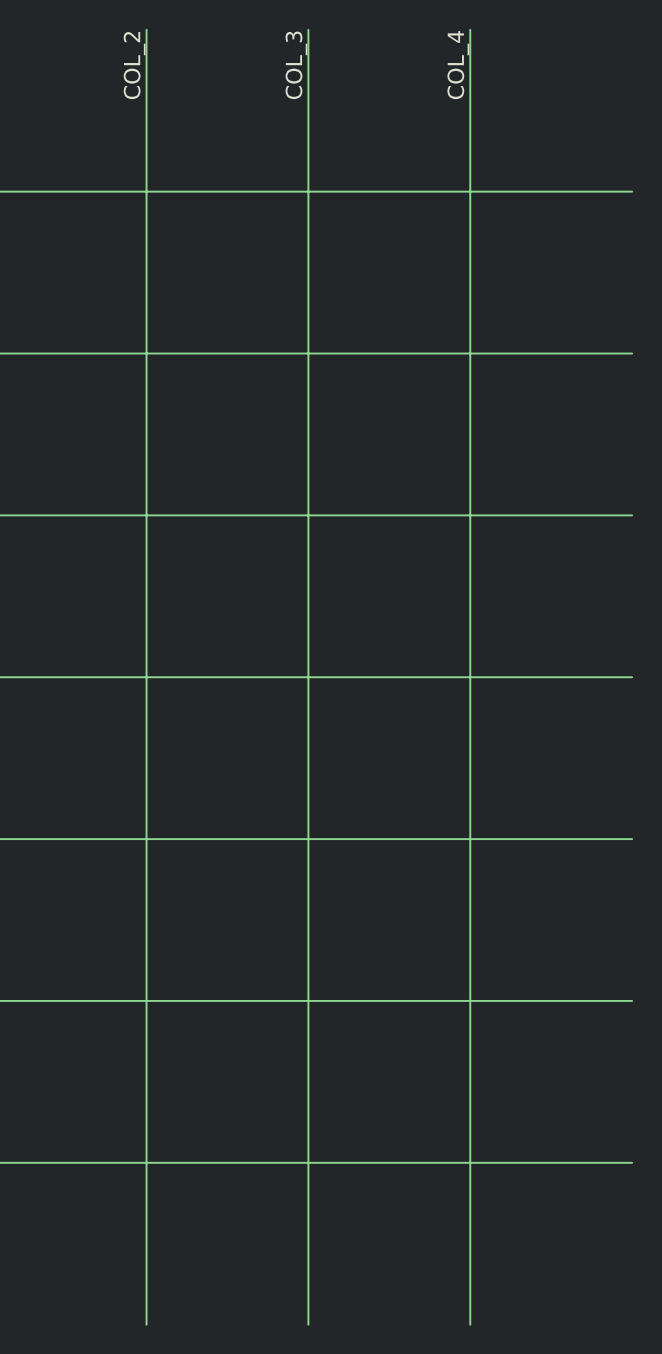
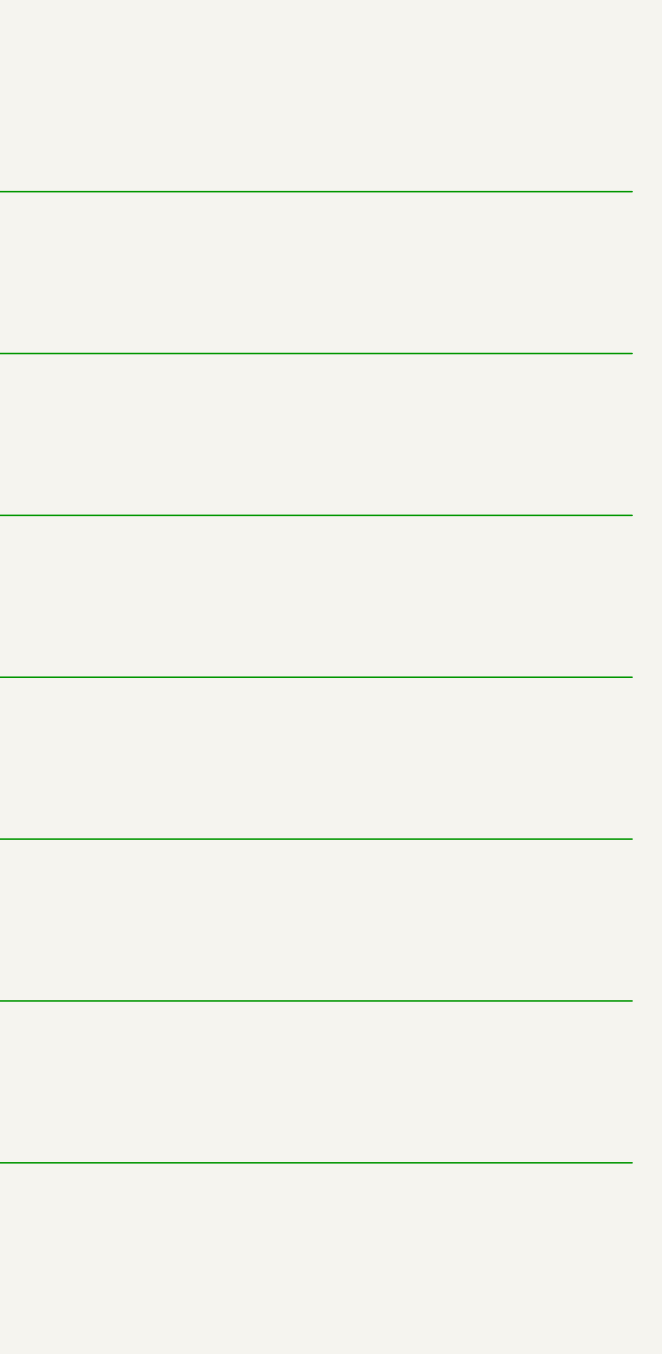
wire: (146, 29) (146, 1324) -> none
wire: (308, 29) (308, 1324) -> none
wire: (470, 29) (470, 1324) -> none
label: COL_2 (134, 65) -> none
label: COL_3 (296, 65) -> none
label: COL_4 (458, 65) -> none

